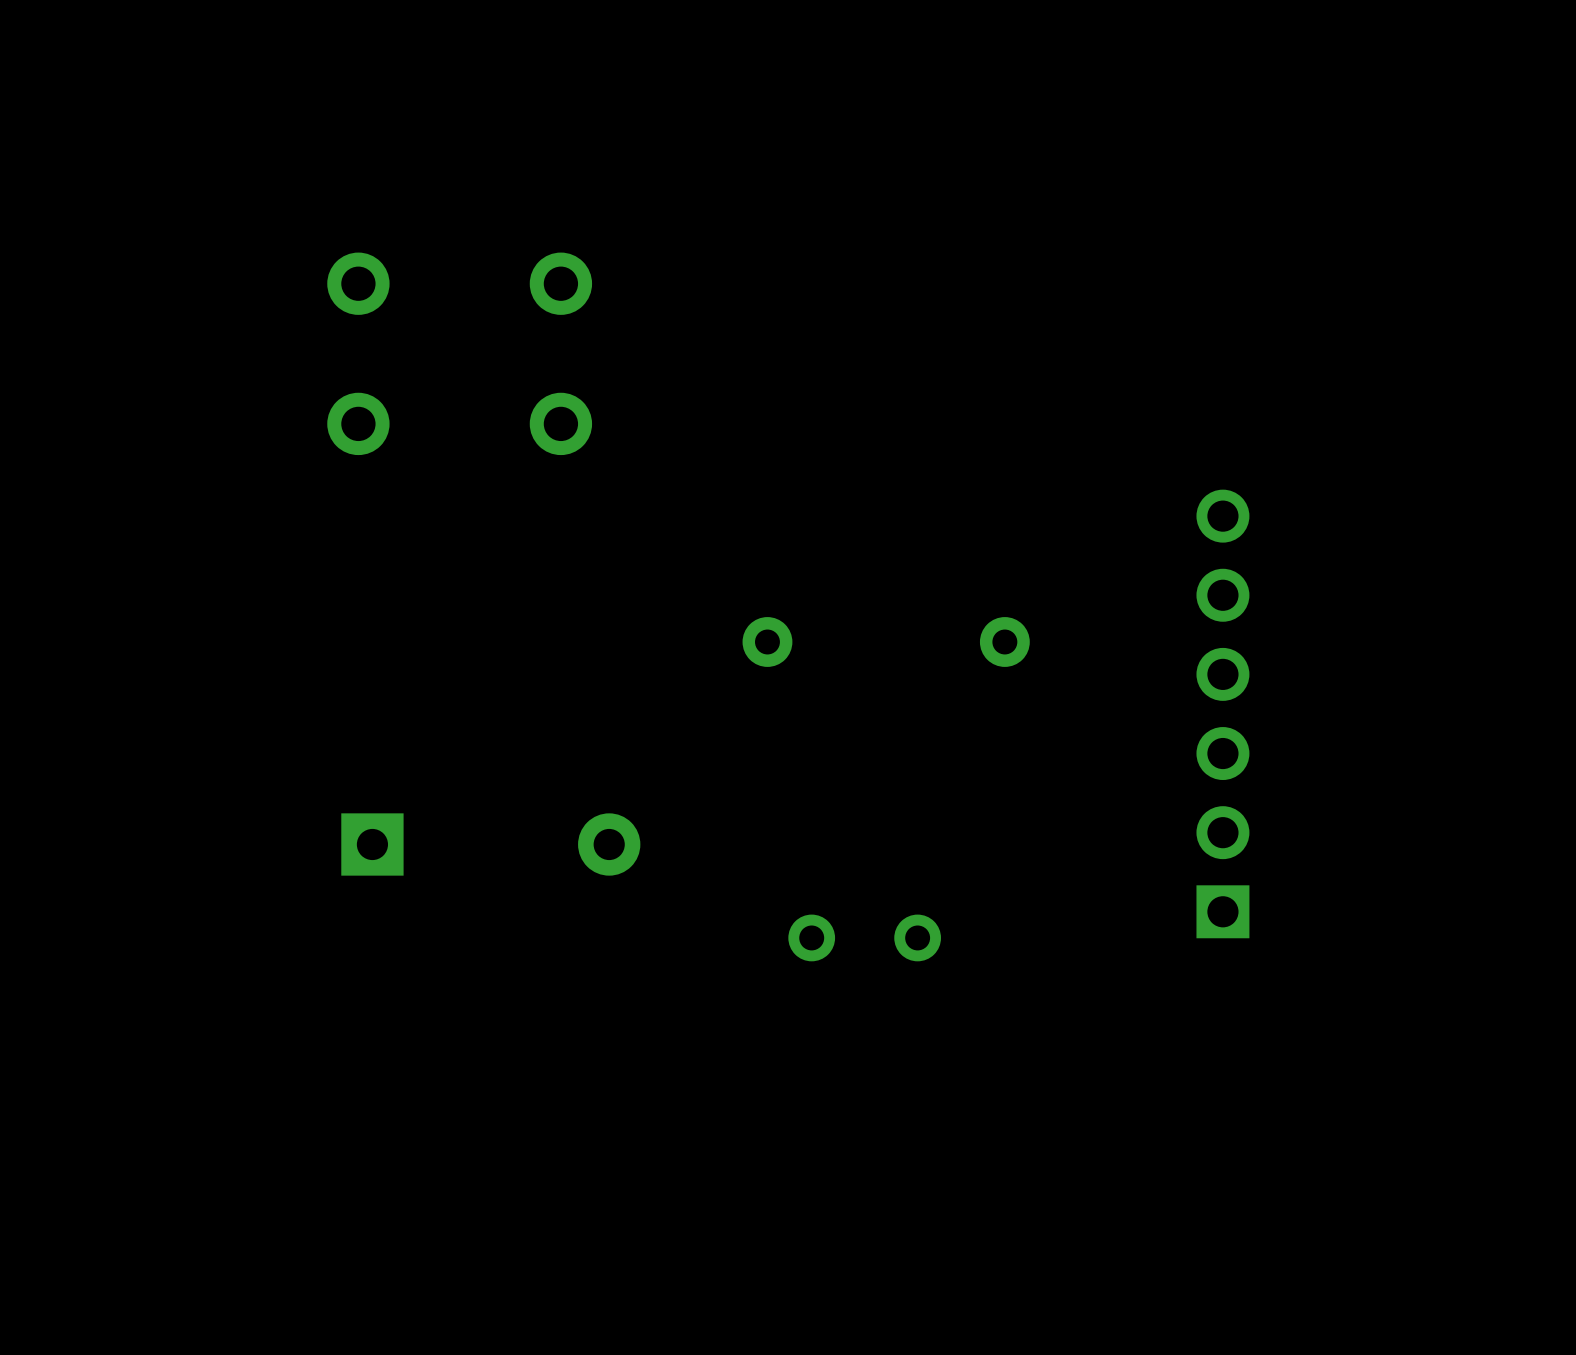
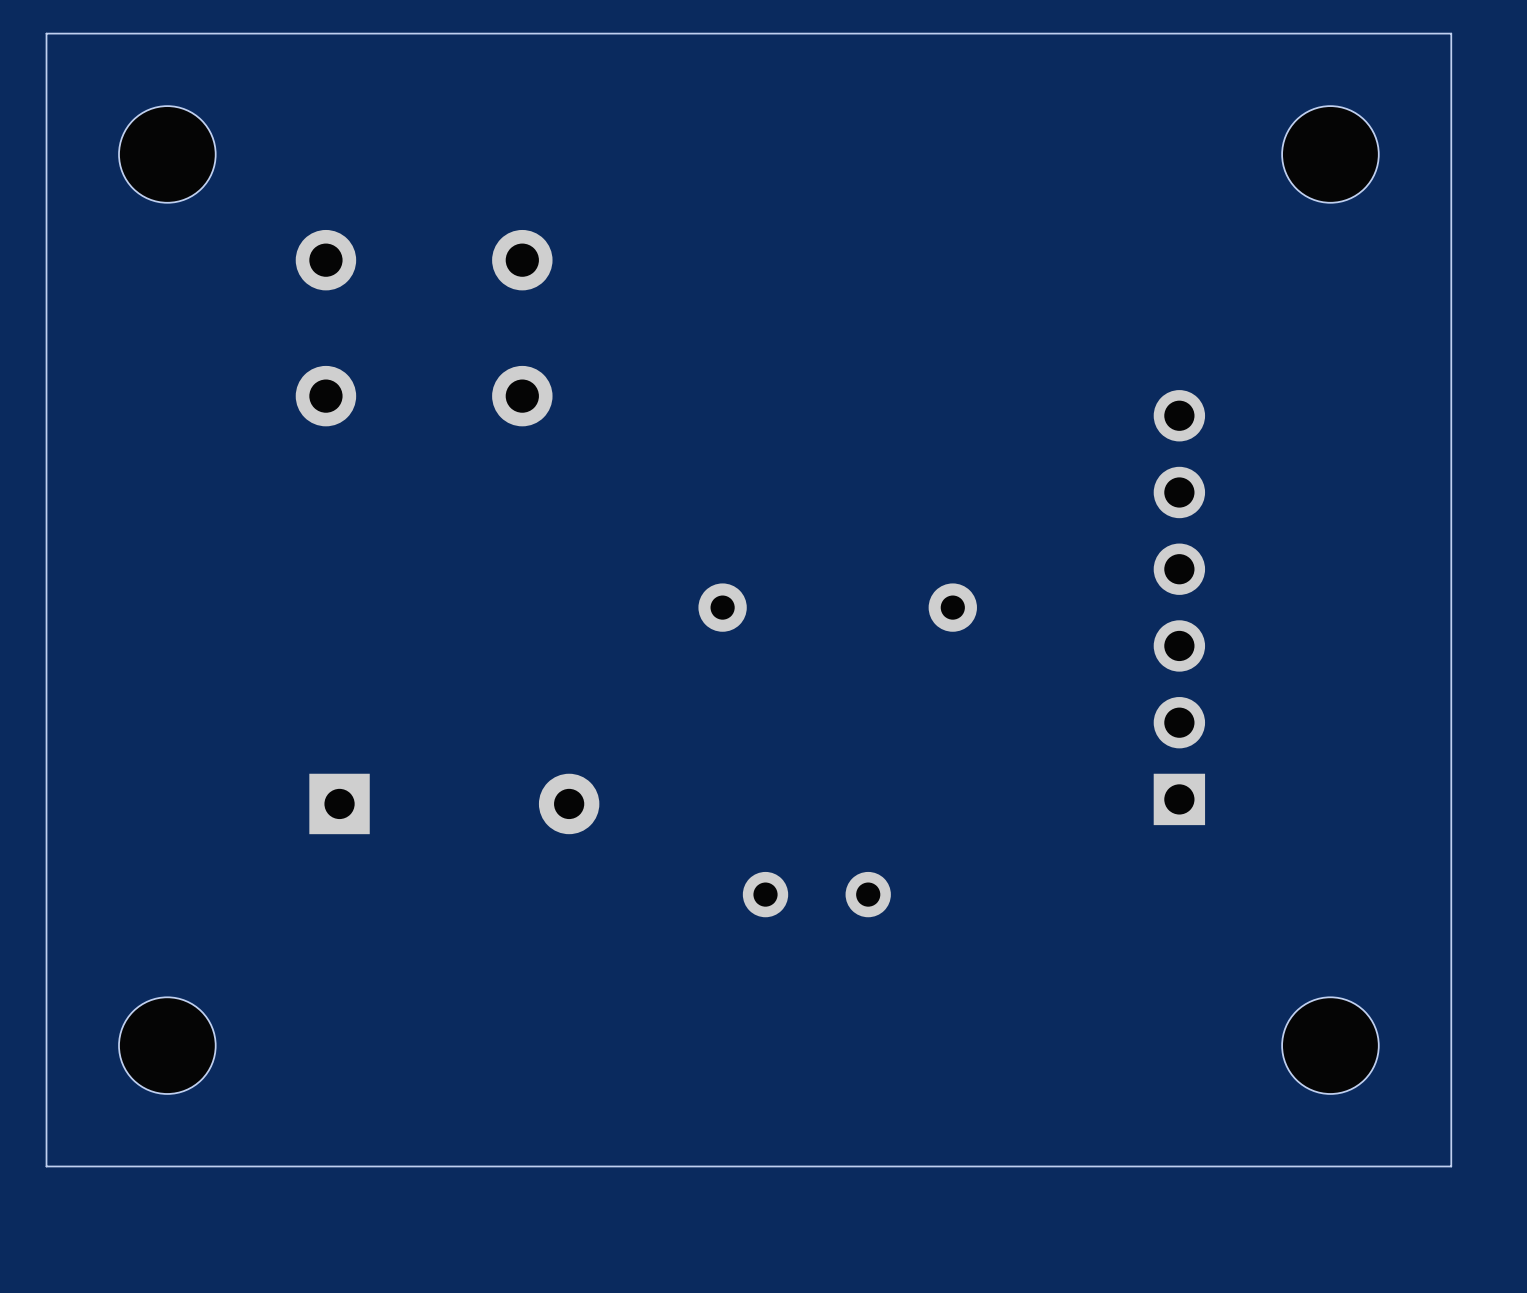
board edge: none -> (1451, 33) (46, 33) (46, 1166) (1451, 1166) (1451, 33)
part: none -> (167, 154)
part: none -> (1330, 154)
part position: (1222, 713) -> (1179, 607)
part: none -> (167, 1045)
part: none -> (1330, 1045)

